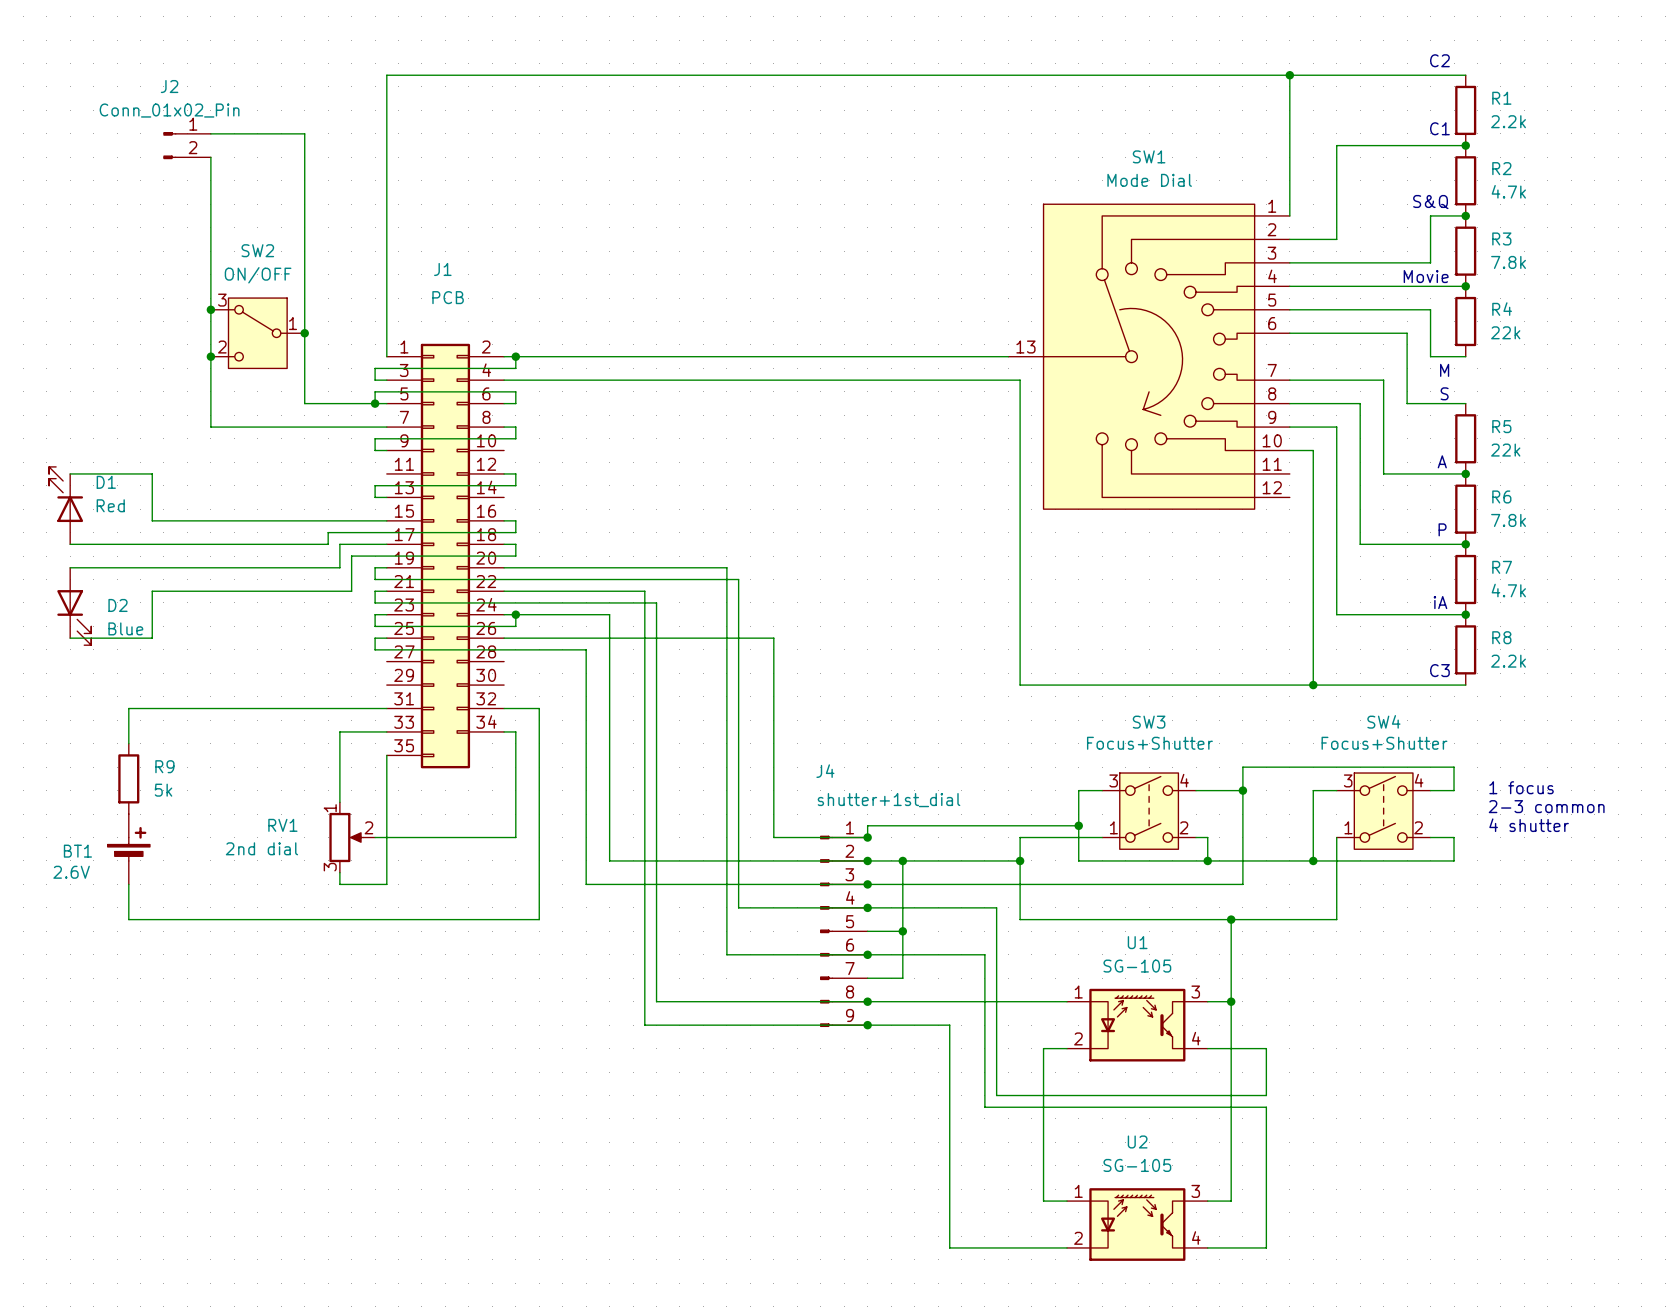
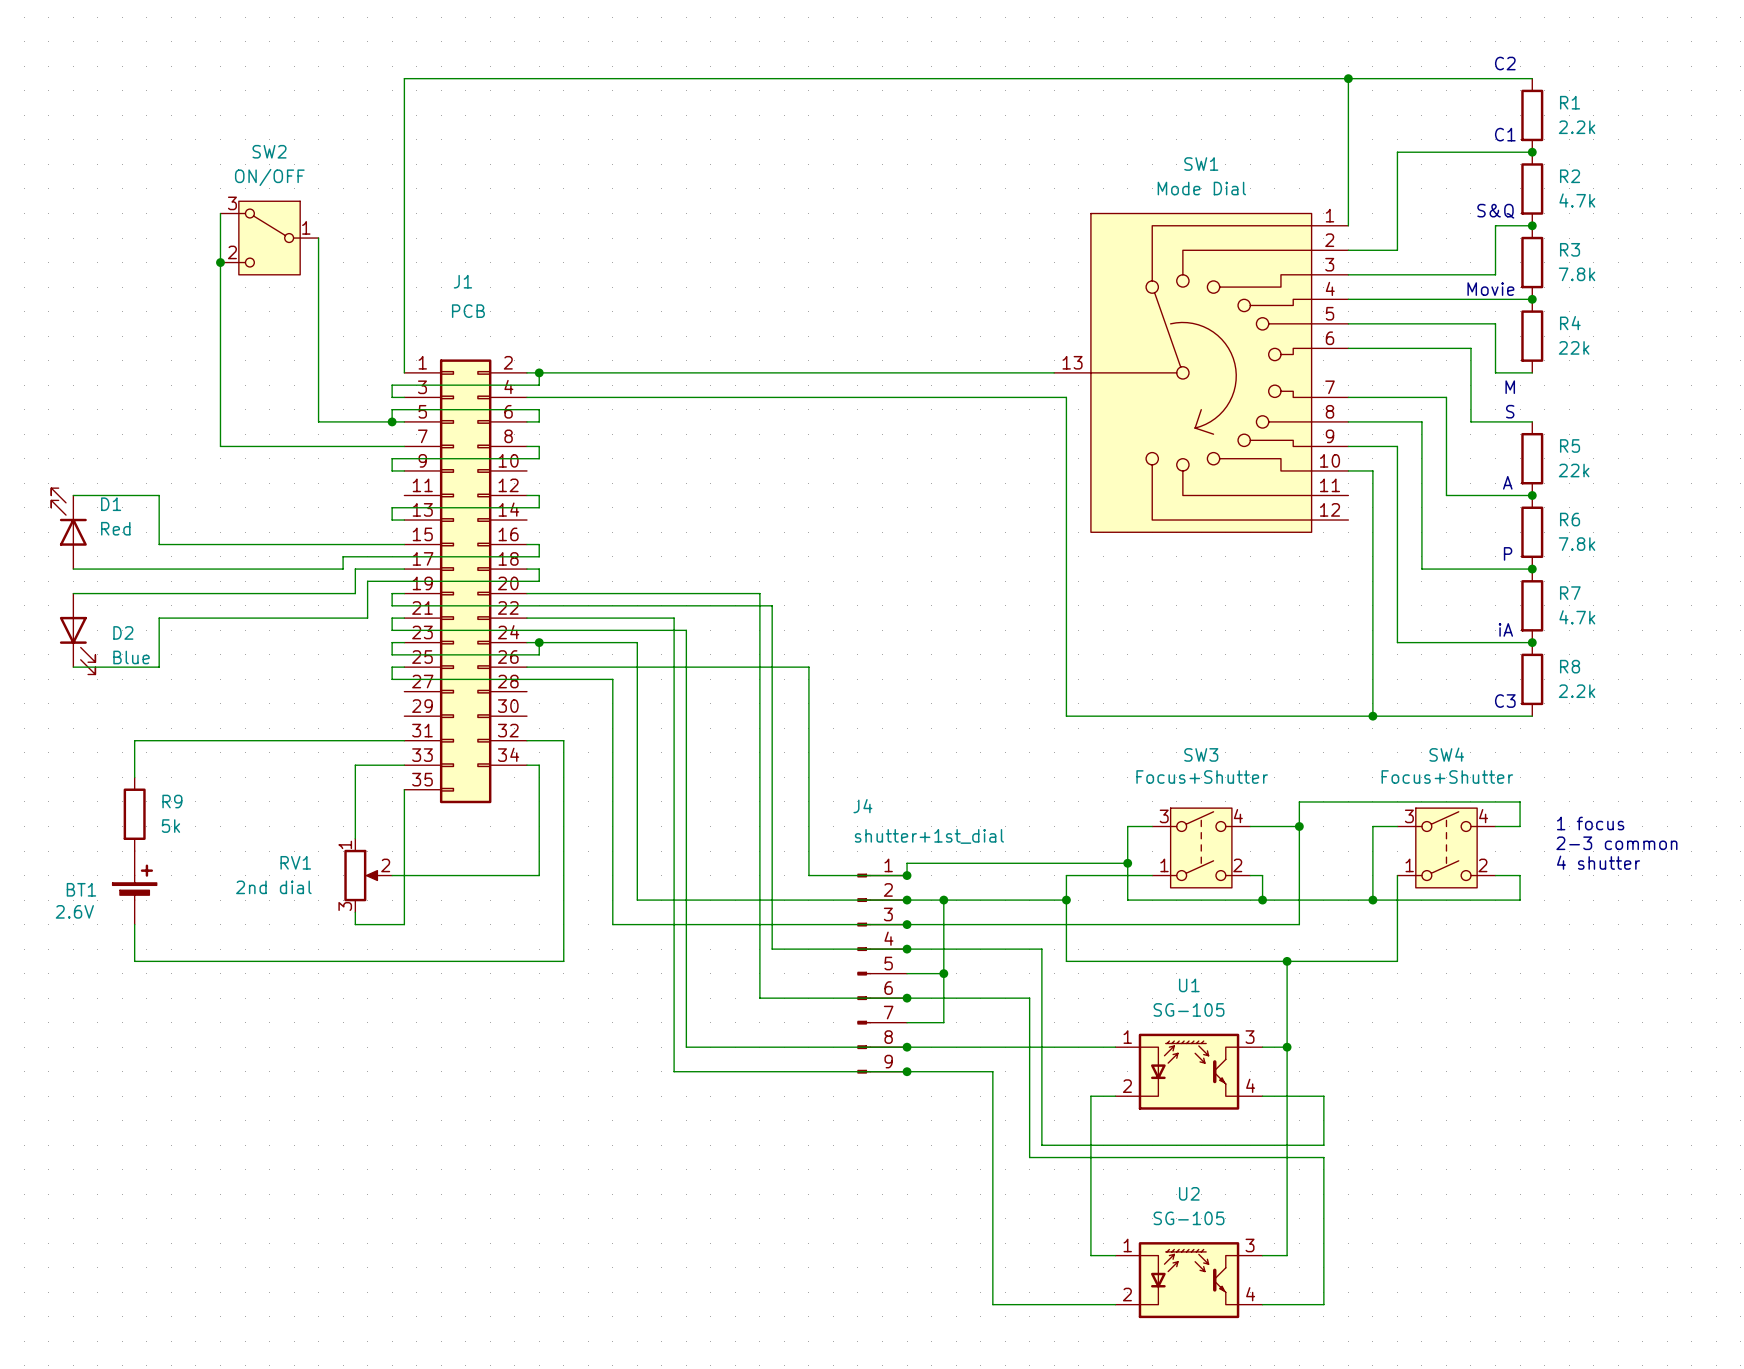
wire: (210, 133) (304, 133) (304, 227) -> none
J2: Conn_01x02_Pin (187, 145) -> none
wire: (210, 157) (210, 204) -> none
junction: none -> (220, 262)
junction: (210, 309) -> none
SW2 position: (257, 333) -> (269, 238)
junction: (304, 333) -> none
junction: (210, 356) -> none

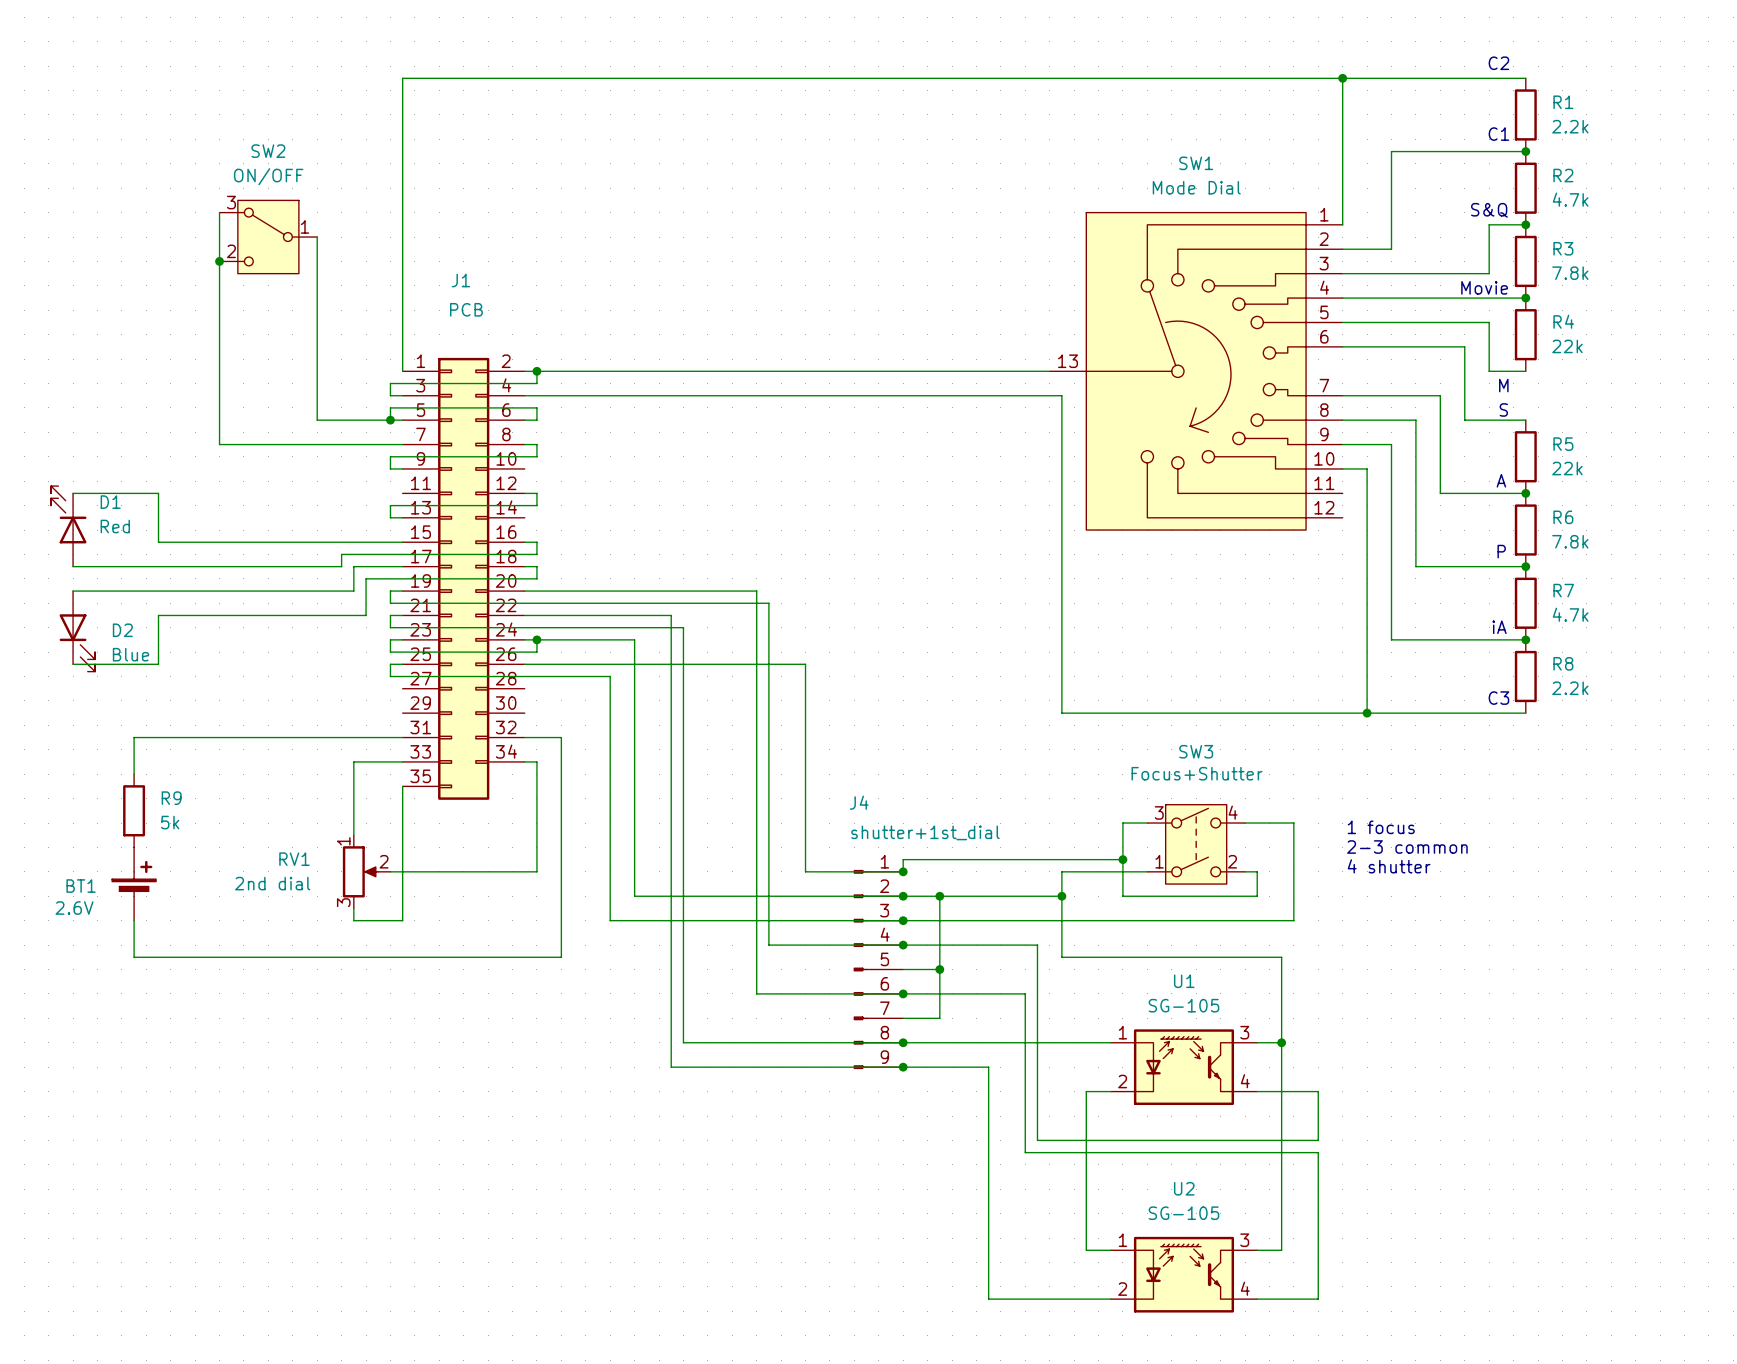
text position: 1 focus (1590, 823) -> 1 focus (1381, 827)
wire: (1299, 826) (1299, 801) (1520, 801) (1520, 826) (1495, 826) -> none
junction: (1299, 826) -> none
wire: (1397, 826) (1372, 826) (1372, 900) -> none
text position: 2-3 common (1616, 843) -> 2-3 common (1407, 847)
SW4: Focus+Shutter (1446, 847) -> none
text position: 4 shutter (1598, 862) -> 4 shutter (1389, 866)
wire: (1397, 875) (1397, 961) (1287, 961) -> none
wire: (1495, 875) (1520, 875) (1520, 900) (1262, 900) -> none
junction: (1262, 900) -> none
junction: (1372, 900) -> none
junction: (1287, 961) -> none

